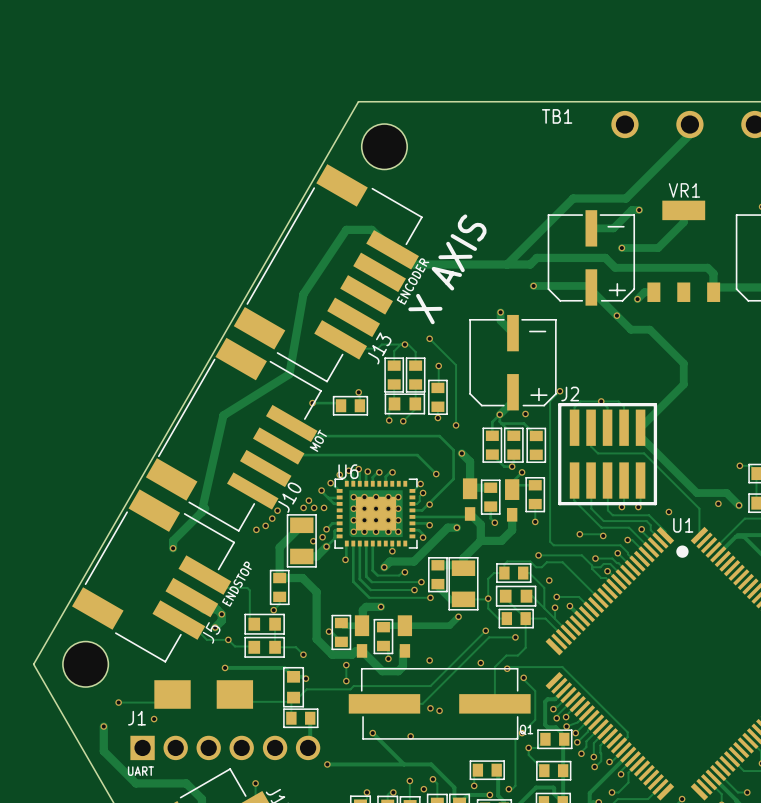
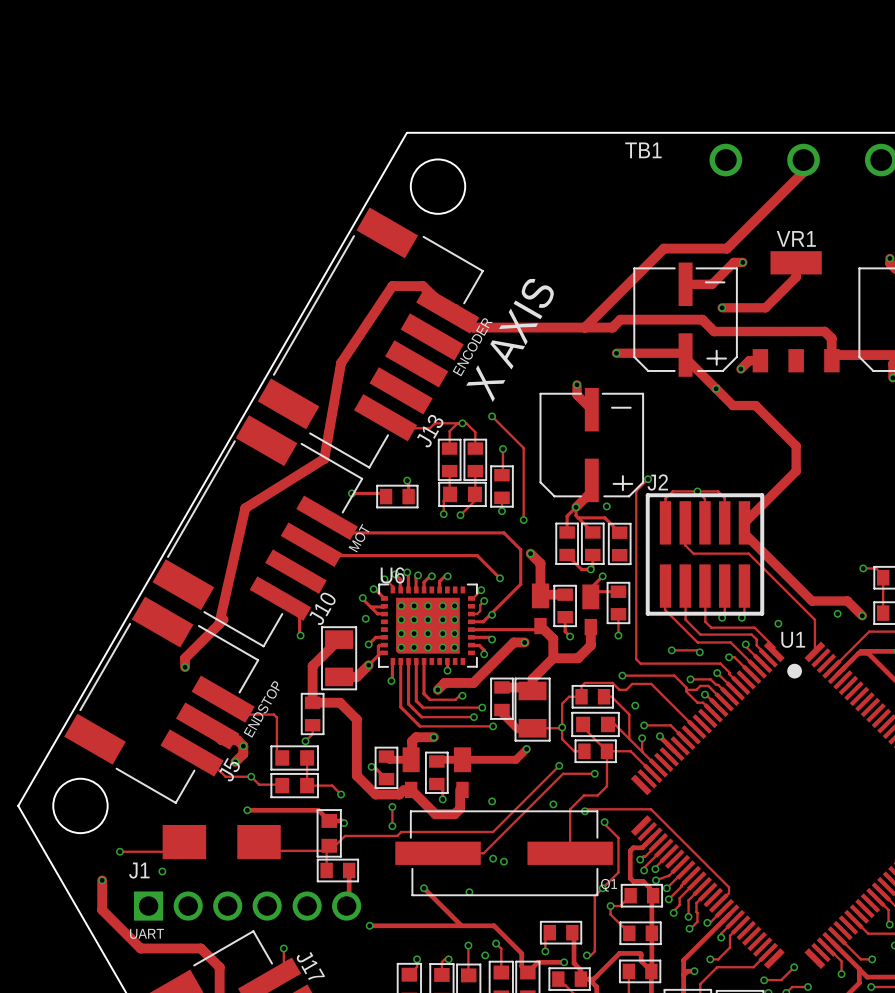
via: (308, 500) -> none
track: none -> (299, 613) (300, 635)
via: (303, 507) -> none
via: (314, 507) -> none
via: (277, 510) -> none
via: (272, 518) -> none
via: none -> (300, 635)
via: (265, 525) -> none
via: (256, 529) -> none
via: (322, 537) -> none
via: (313, 541) -> none

